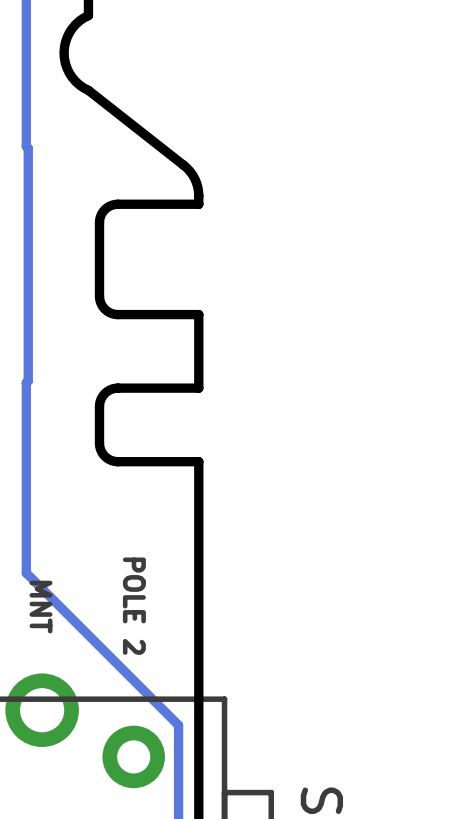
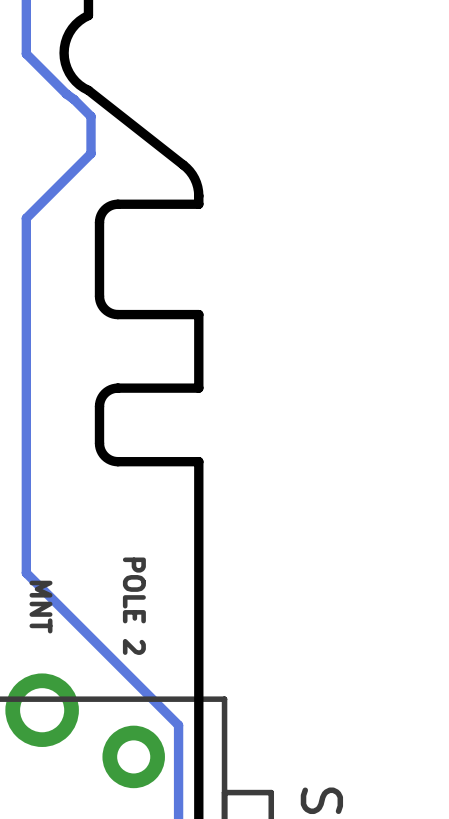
track: (26, 53) (26, 146) (28, 148) (28, 380) (26, 382) -> (26, 53) (91, 116) (91, 153) (26, 218) (26, 382)

